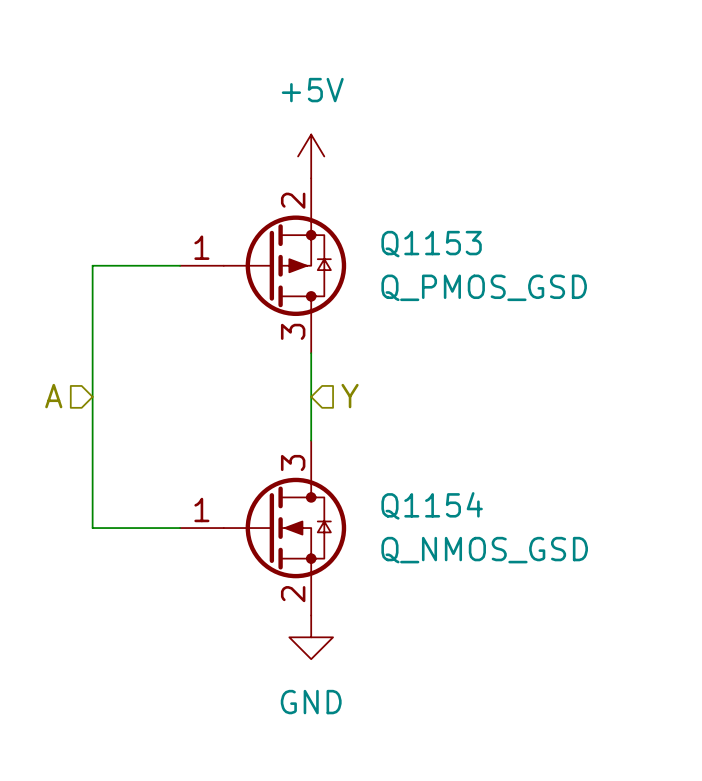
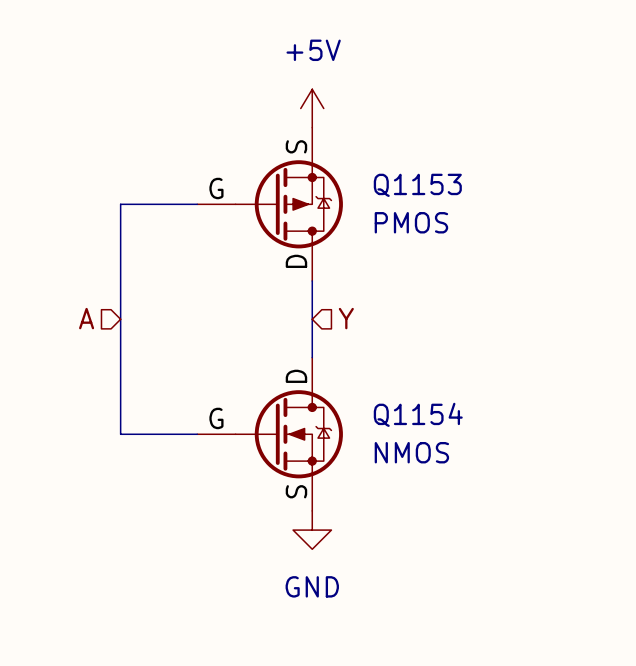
Q1153 symbol: [180, 178, 347, 354] -> [197, 127, 343, 281]
Q1153 value: Q_PMOS_GSD (484, 287) -> PMOS (411, 222)
Q1154 symbol: [180, 440, 347, 616] -> [197, 357, 343, 511]
Q1154 value: Q_NMOS_GSD (484, 550) -> NMOS (411, 452)

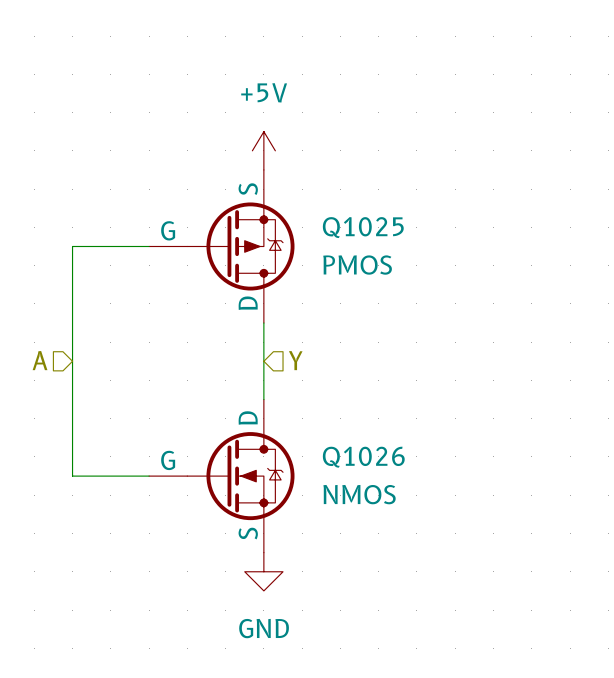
Q1153 name: Q1153 (417, 185) -> Q1025 (363, 227)
Q1154 name: Q1154 (418, 414) -> Q1026 (363, 457)

